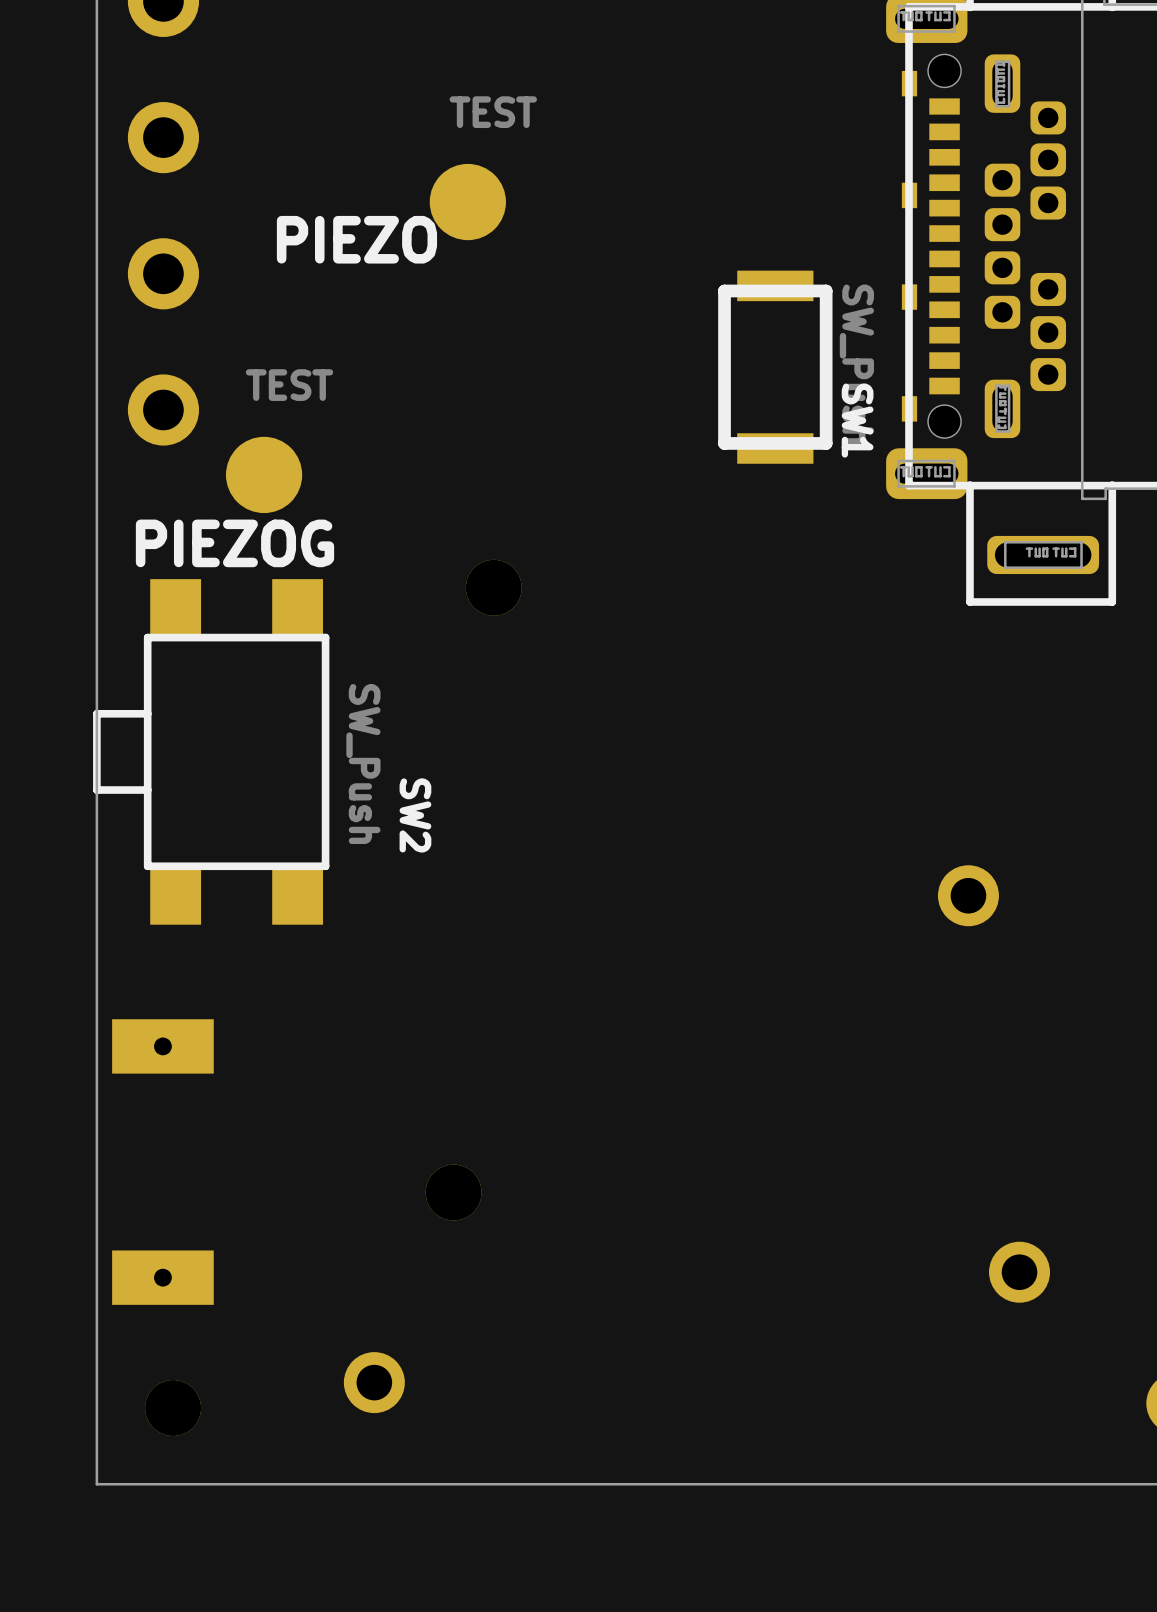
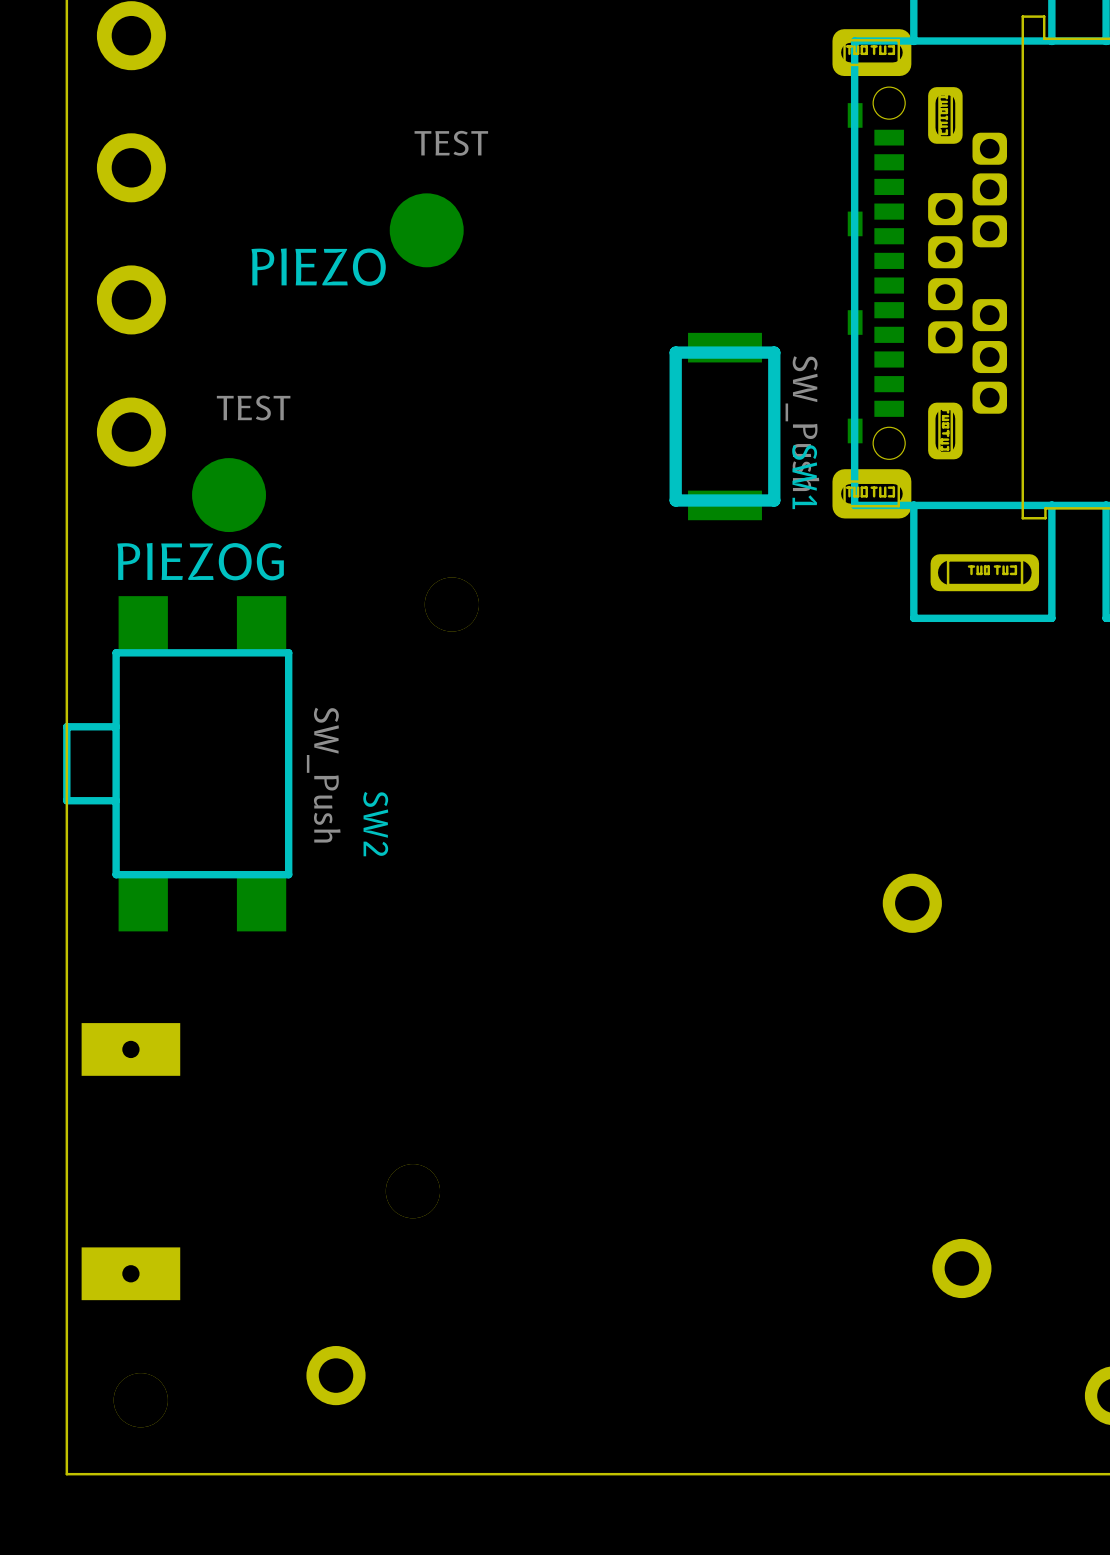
SW1 position: (775, 367) -> (724, 426)

